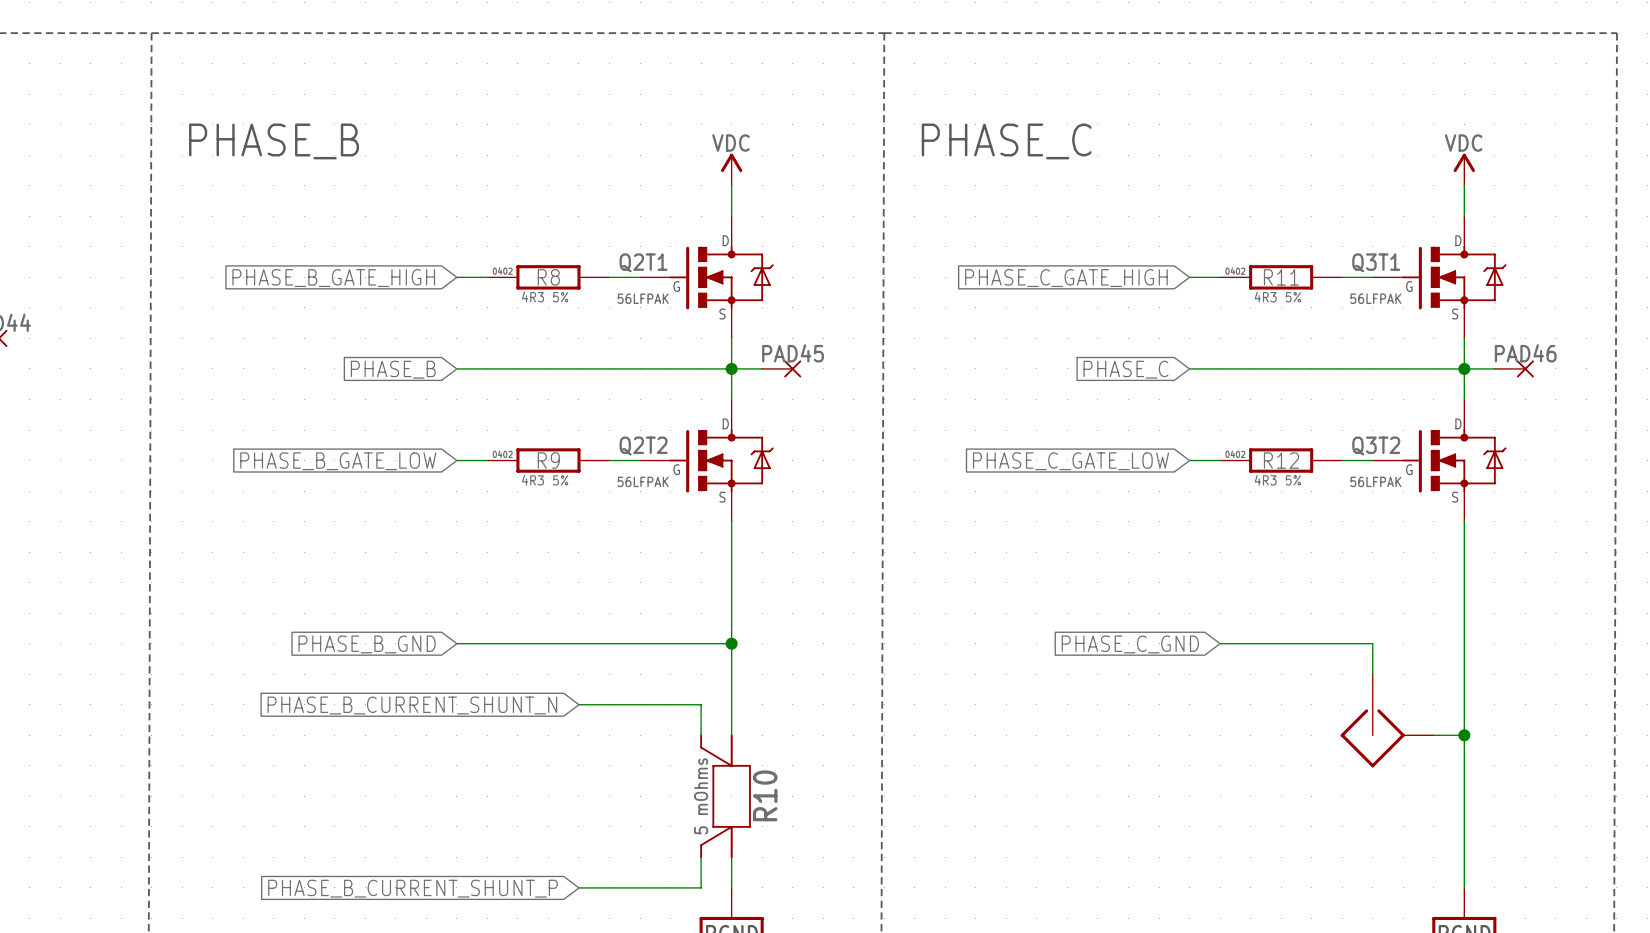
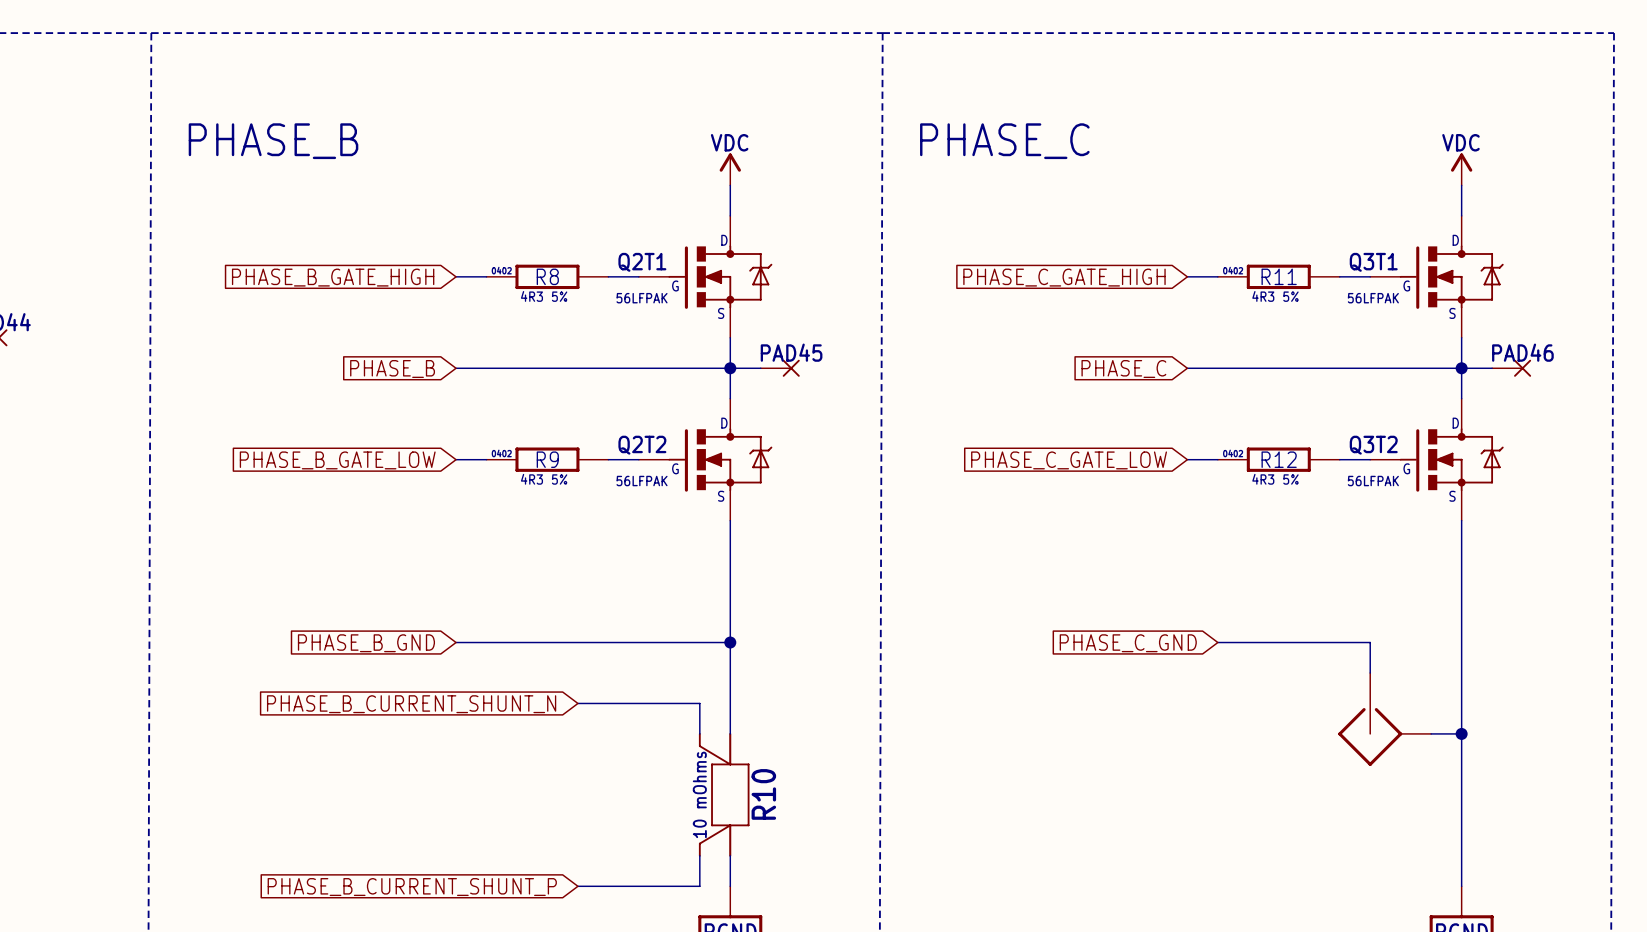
R10 value: 5 mOhms (701, 796) -> 10 mOhms (699, 794)

